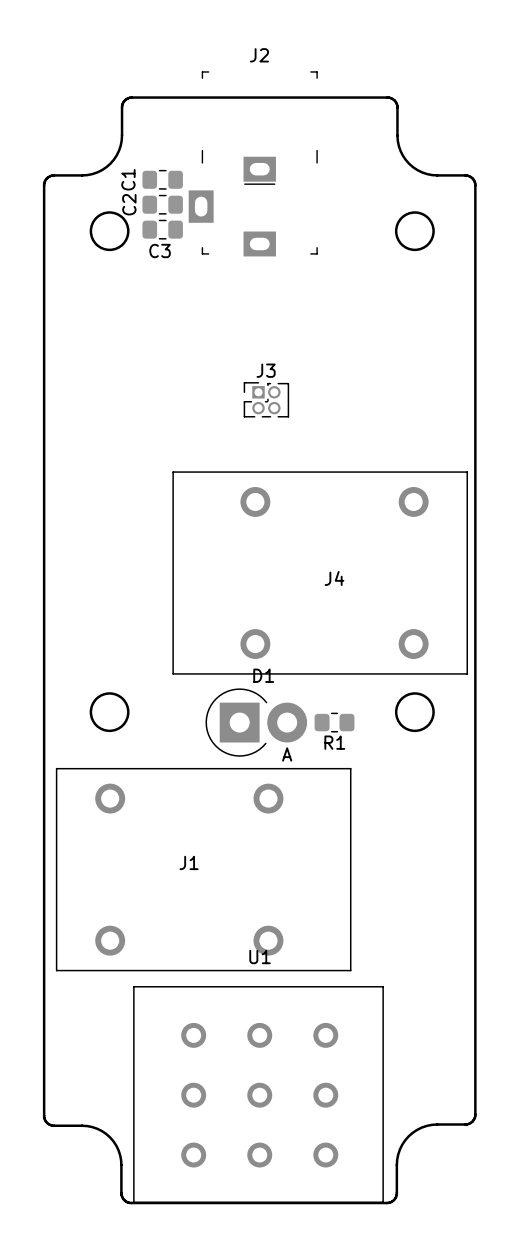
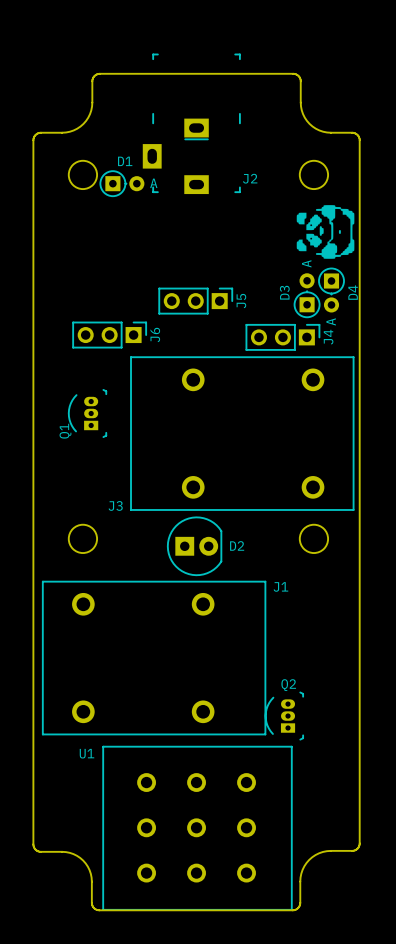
J2 name position: J2 (259, 55) -> J2 (250, 178)
C1: (162, 179) -> none
C2: (162, 204) -> none
C3: (162, 229) -> none
drawing: none -> [296, 205, 355, 259]
D4: none -> (331, 290)
D3: none -> (307, 295)
J5: none -> (195, 301)
J3: (266, 399) -> none
J6: none -> (109, 335)
J4: none -> (282, 337)
Q1: none -> (87, 413)
J4 name: J4 (334, 578) -> J3 (115, 505)
D1 footprint: [205, 688, 308, 757] -> [99, 170, 145, 197]
D2: none -> (194, 546)
R1: (334, 722) -> none
J1 name position: J1 (189, 862) -> J1 (280, 586)
Q2: none -> (284, 716)
U1 name position: U1 (260, 957) -> U1 (86, 753)
U1 rotation: 0° (258, 1094) -> 180° (197, 828)

